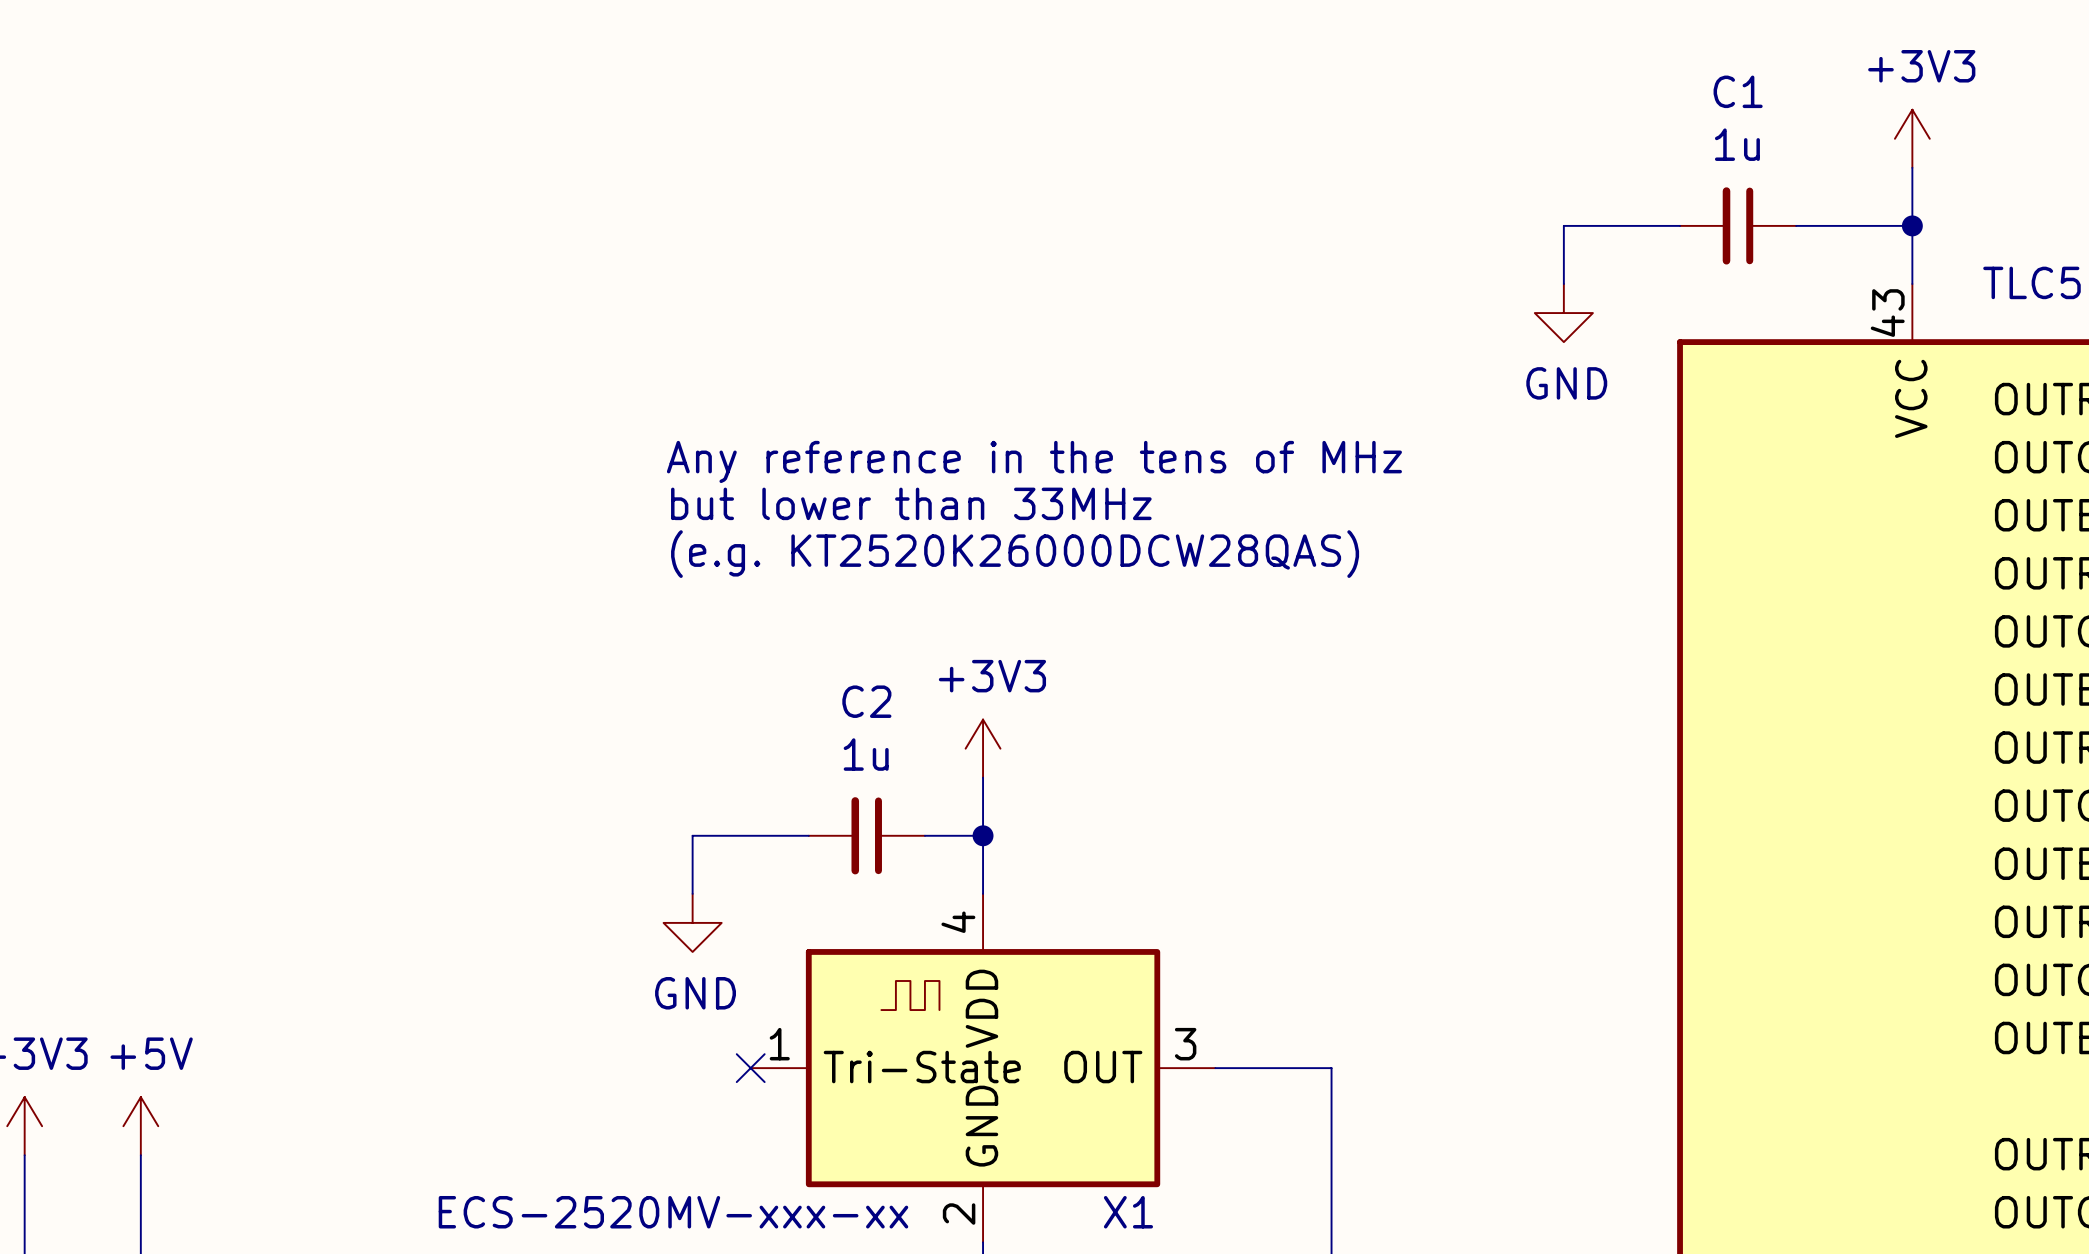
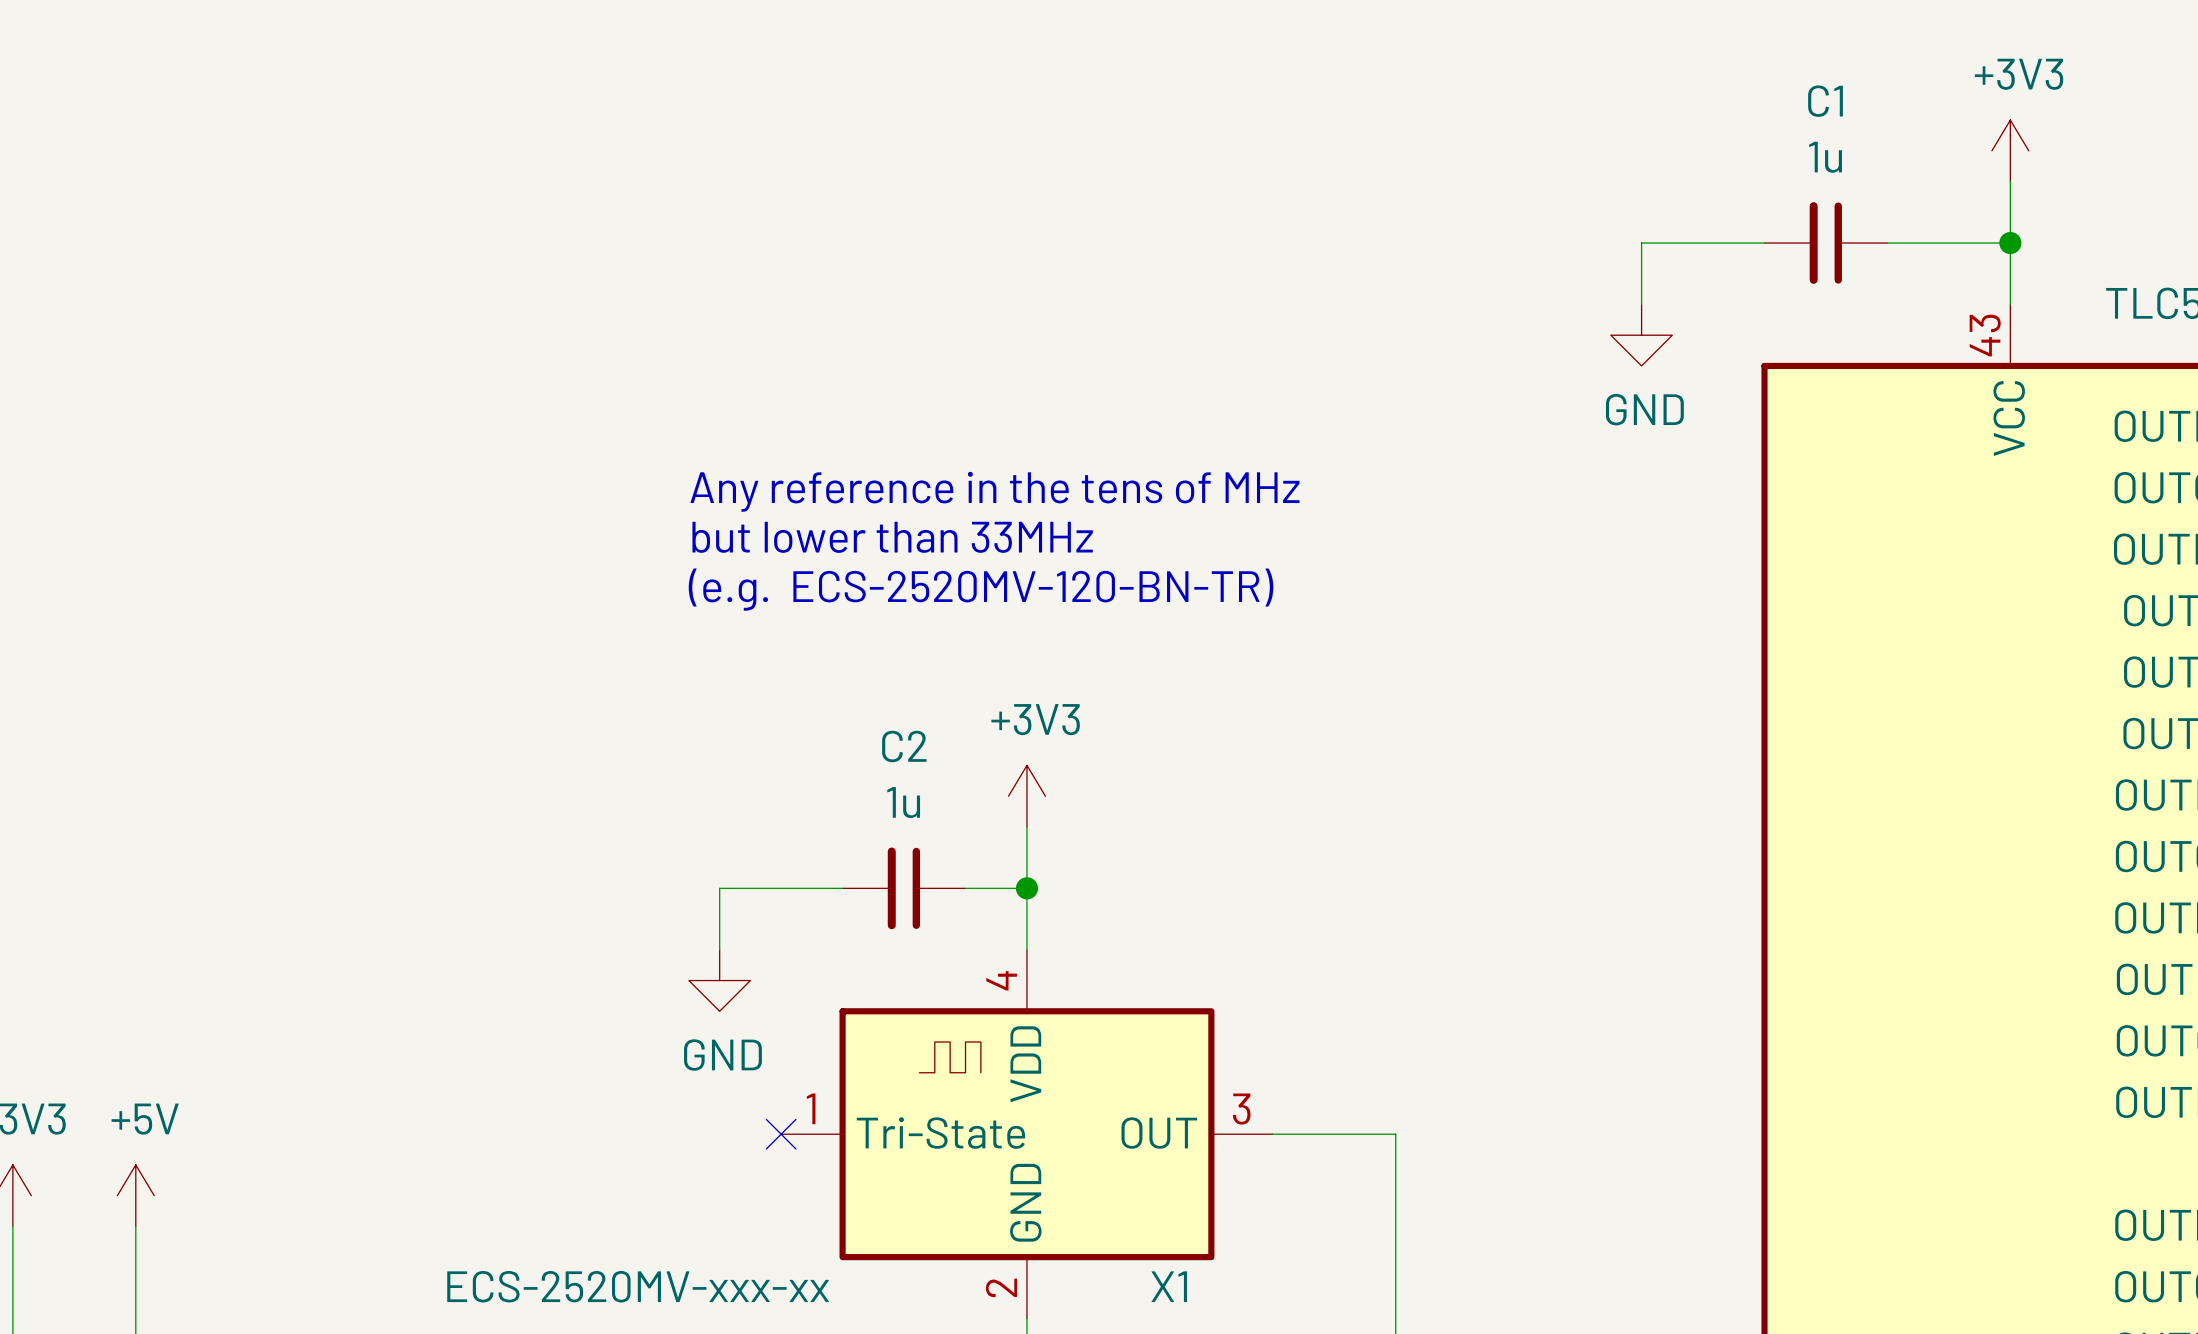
text: (e.g. KT2520K26000DCW28QAS) (1015, 554) -> (e.g. ECS-2520MV-120-BN-TR) (981, 589)

